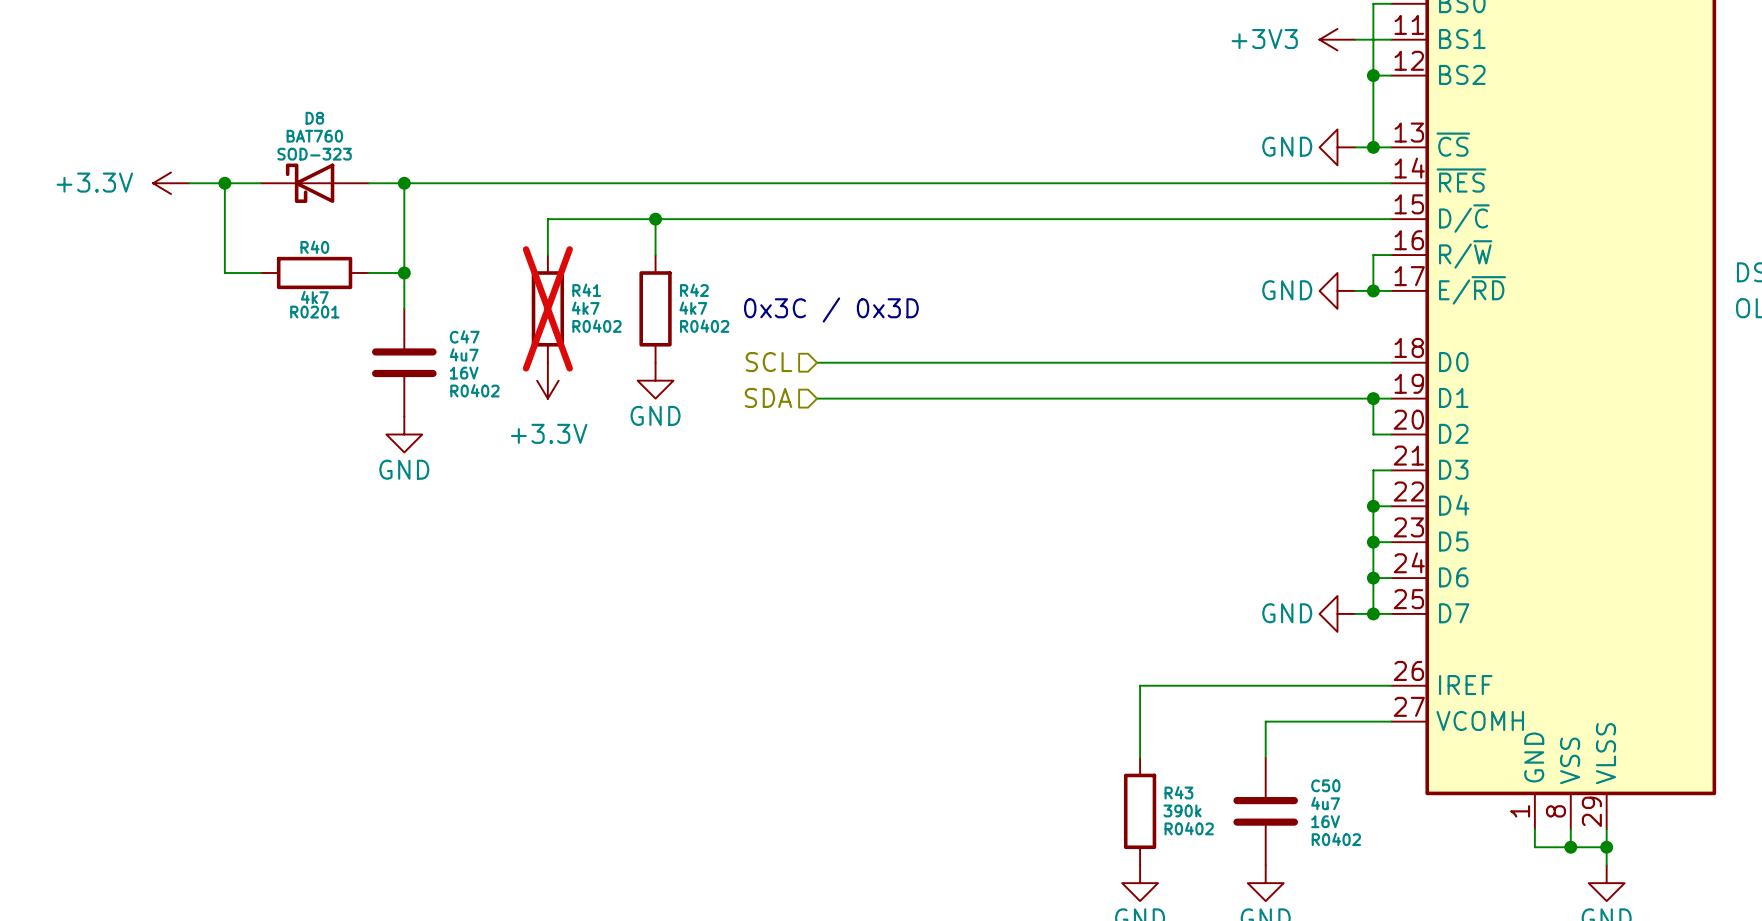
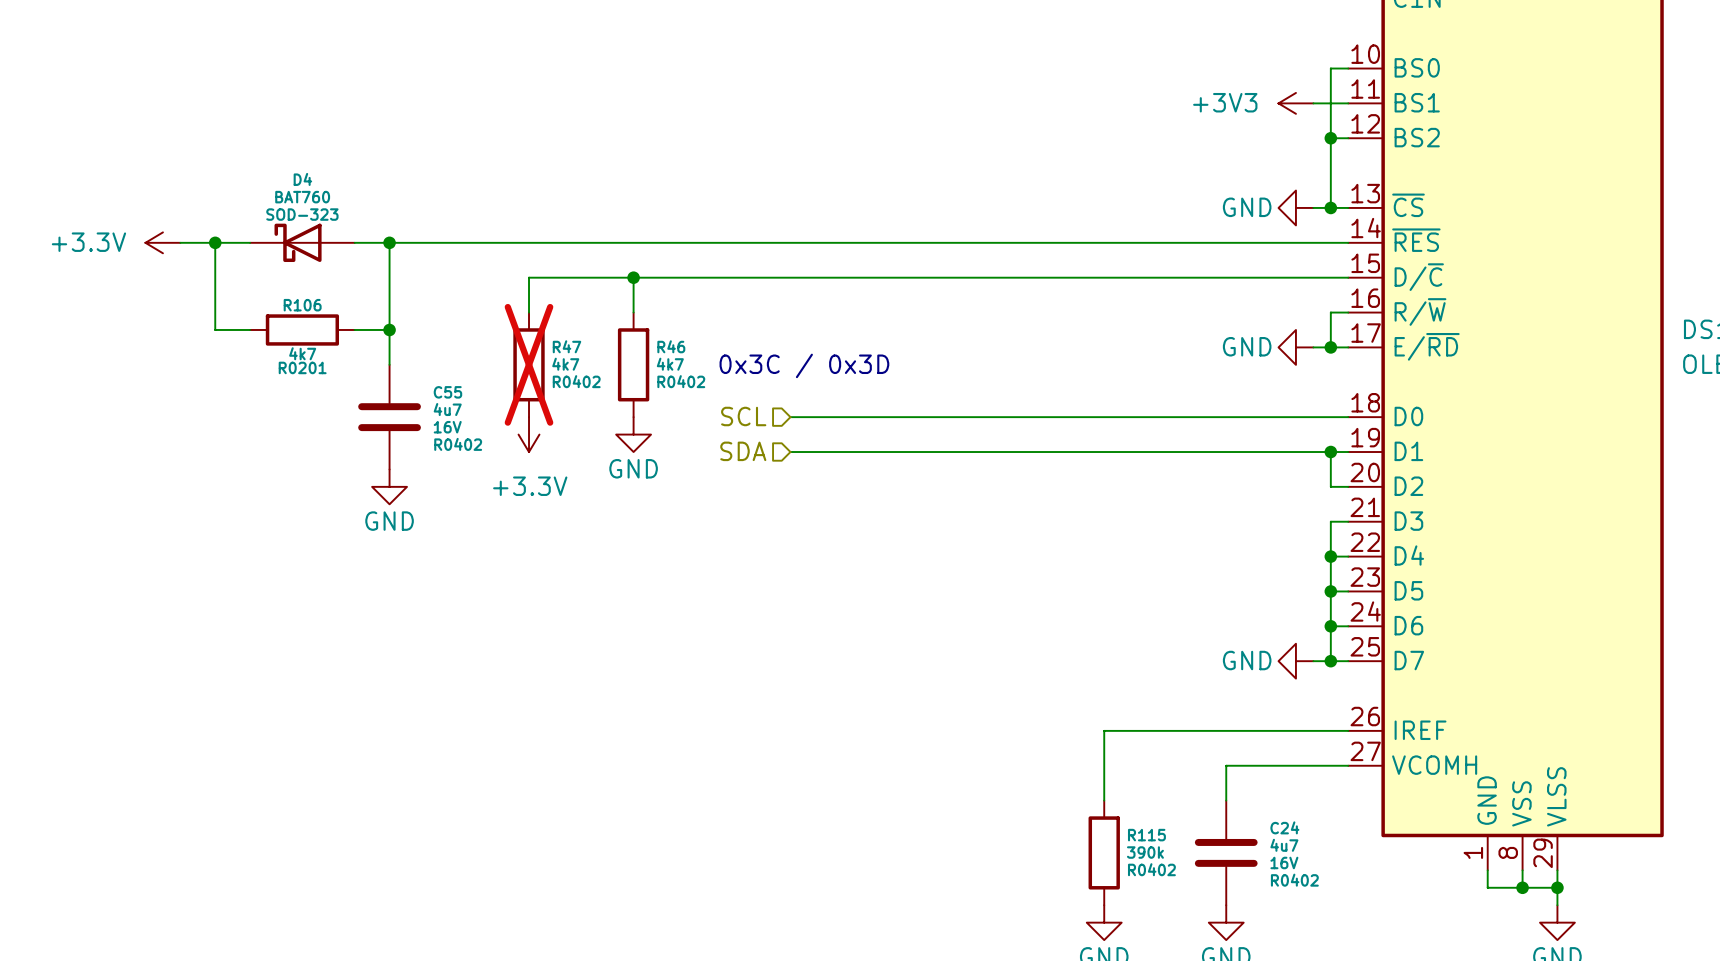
D8 name: D8 (314, 118) -> D4 (302, 179)
R40 name: R40 (314, 247) -> R106 (302, 305)
R41 name: R41 (586, 290) -> R47 (566, 346)
R42 name: R42 (694, 290) -> R46 (671, 346)
C47 name: C47 (464, 336) -> C55 (447, 392)
C50 name: C50 (1325, 785) -> C24 (1284, 827)
R43 name: R43 (1178, 792) -> R115 (1146, 835)

